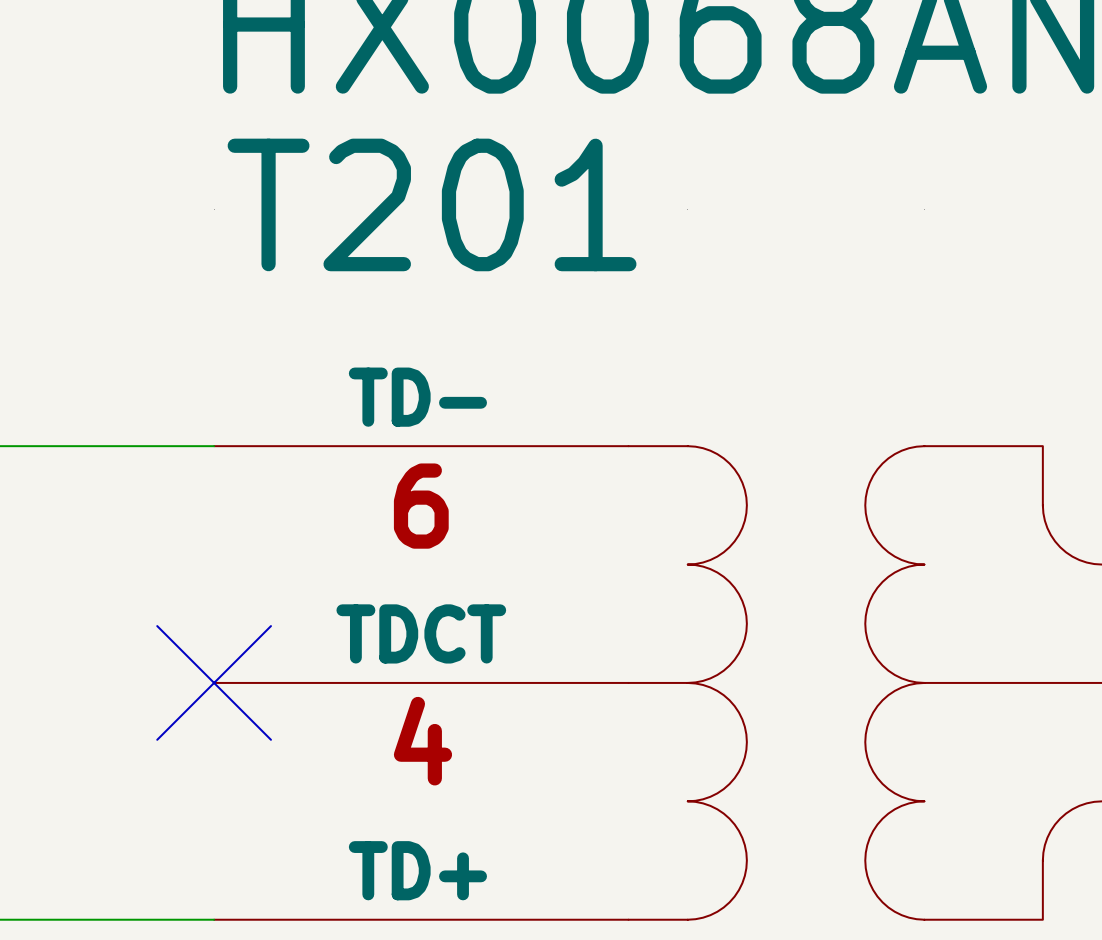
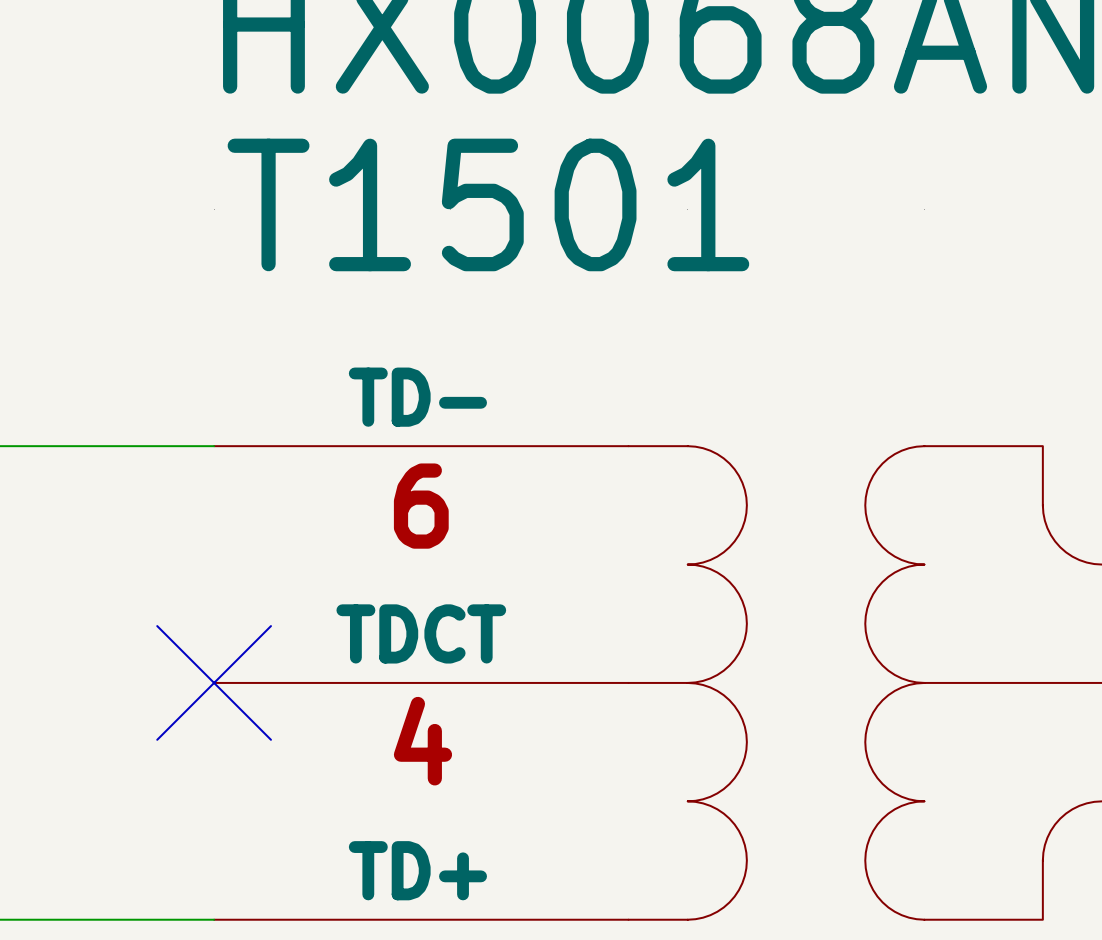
T201 name: T201 (432, 204) -> T1501 (488, 204)

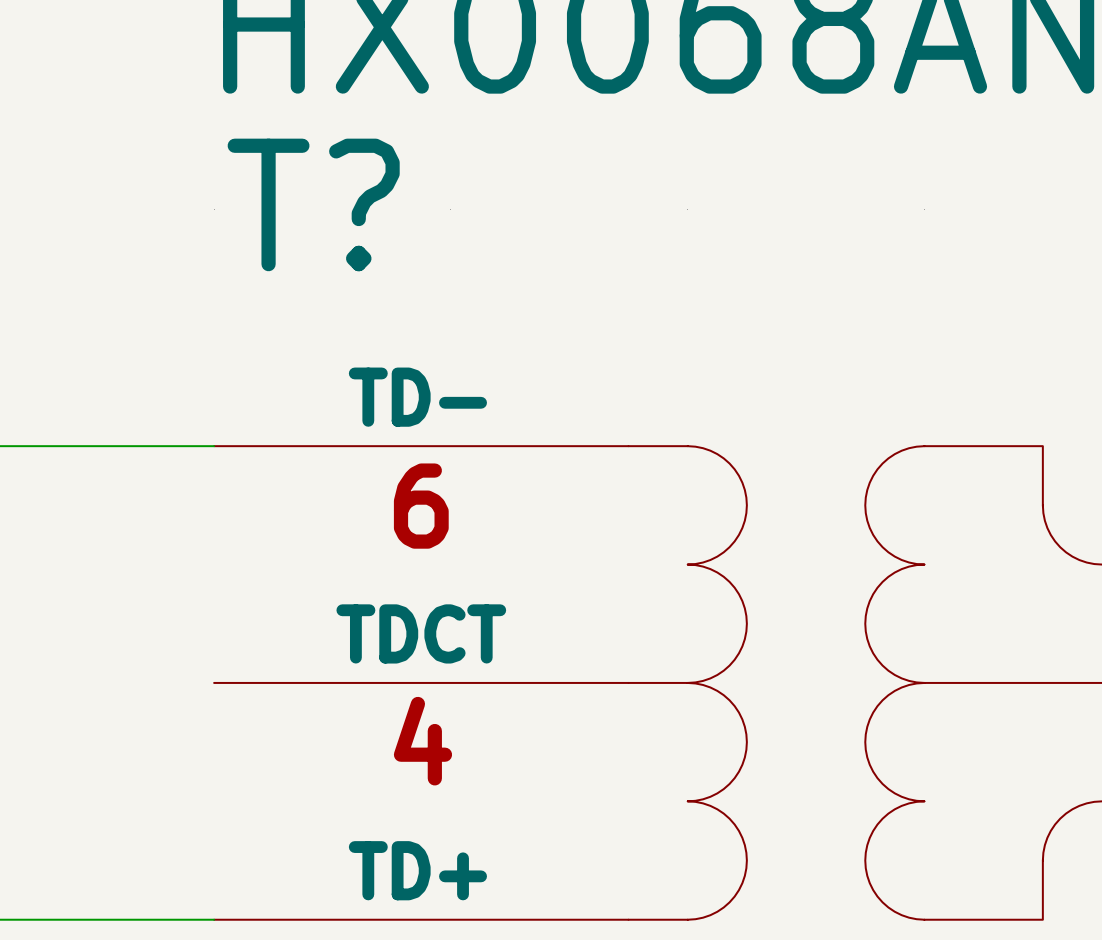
T1501 name: T1501 (488, 204) -> T? (313, 204)
no-connect mark: (214, 682) -> none

